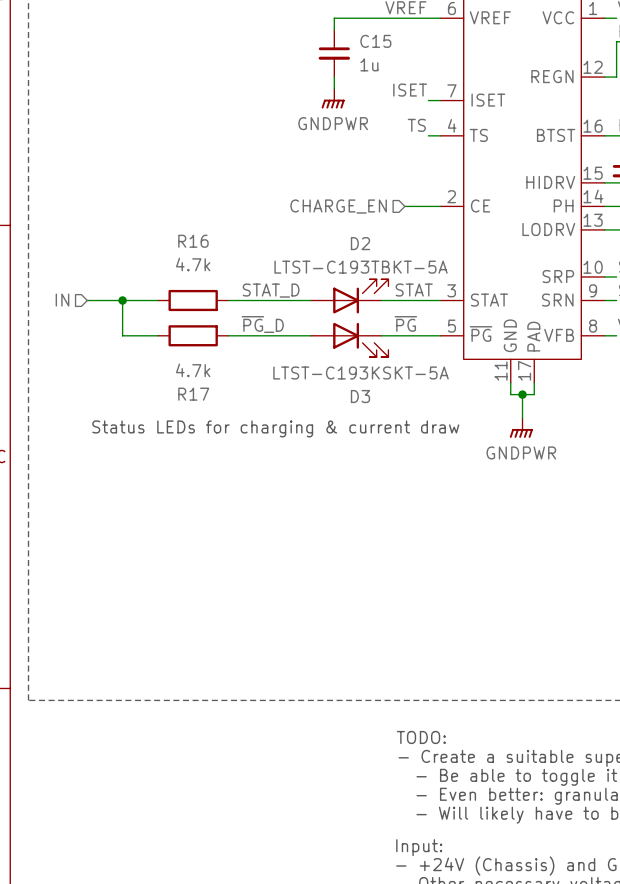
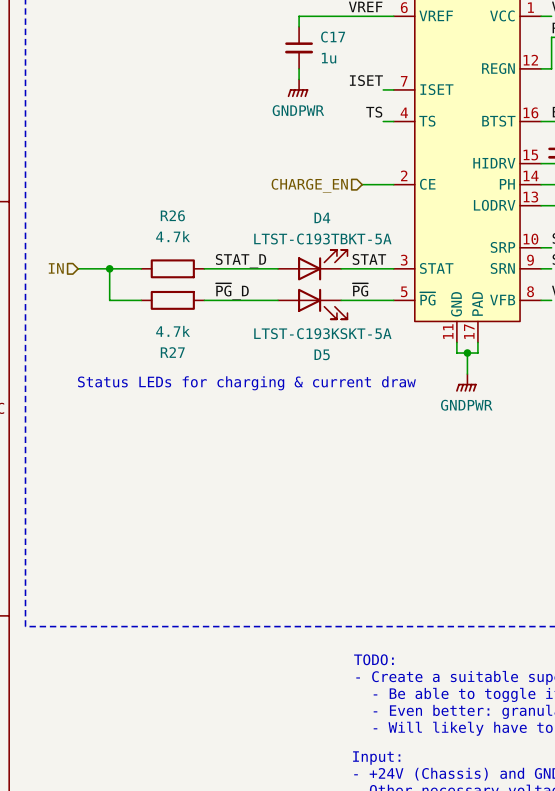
C15 name: C15 (375, 41) -> C17 (333, 37)
R16 name: R16 (193, 241) -> R26 (172, 215)
D2 name: D2 (360, 243) -> D4 (322, 217)
R17 name: R17 (193, 394) -> R27 (172, 352)
D3 name: D3 (360, 396) -> D5 (322, 354)

